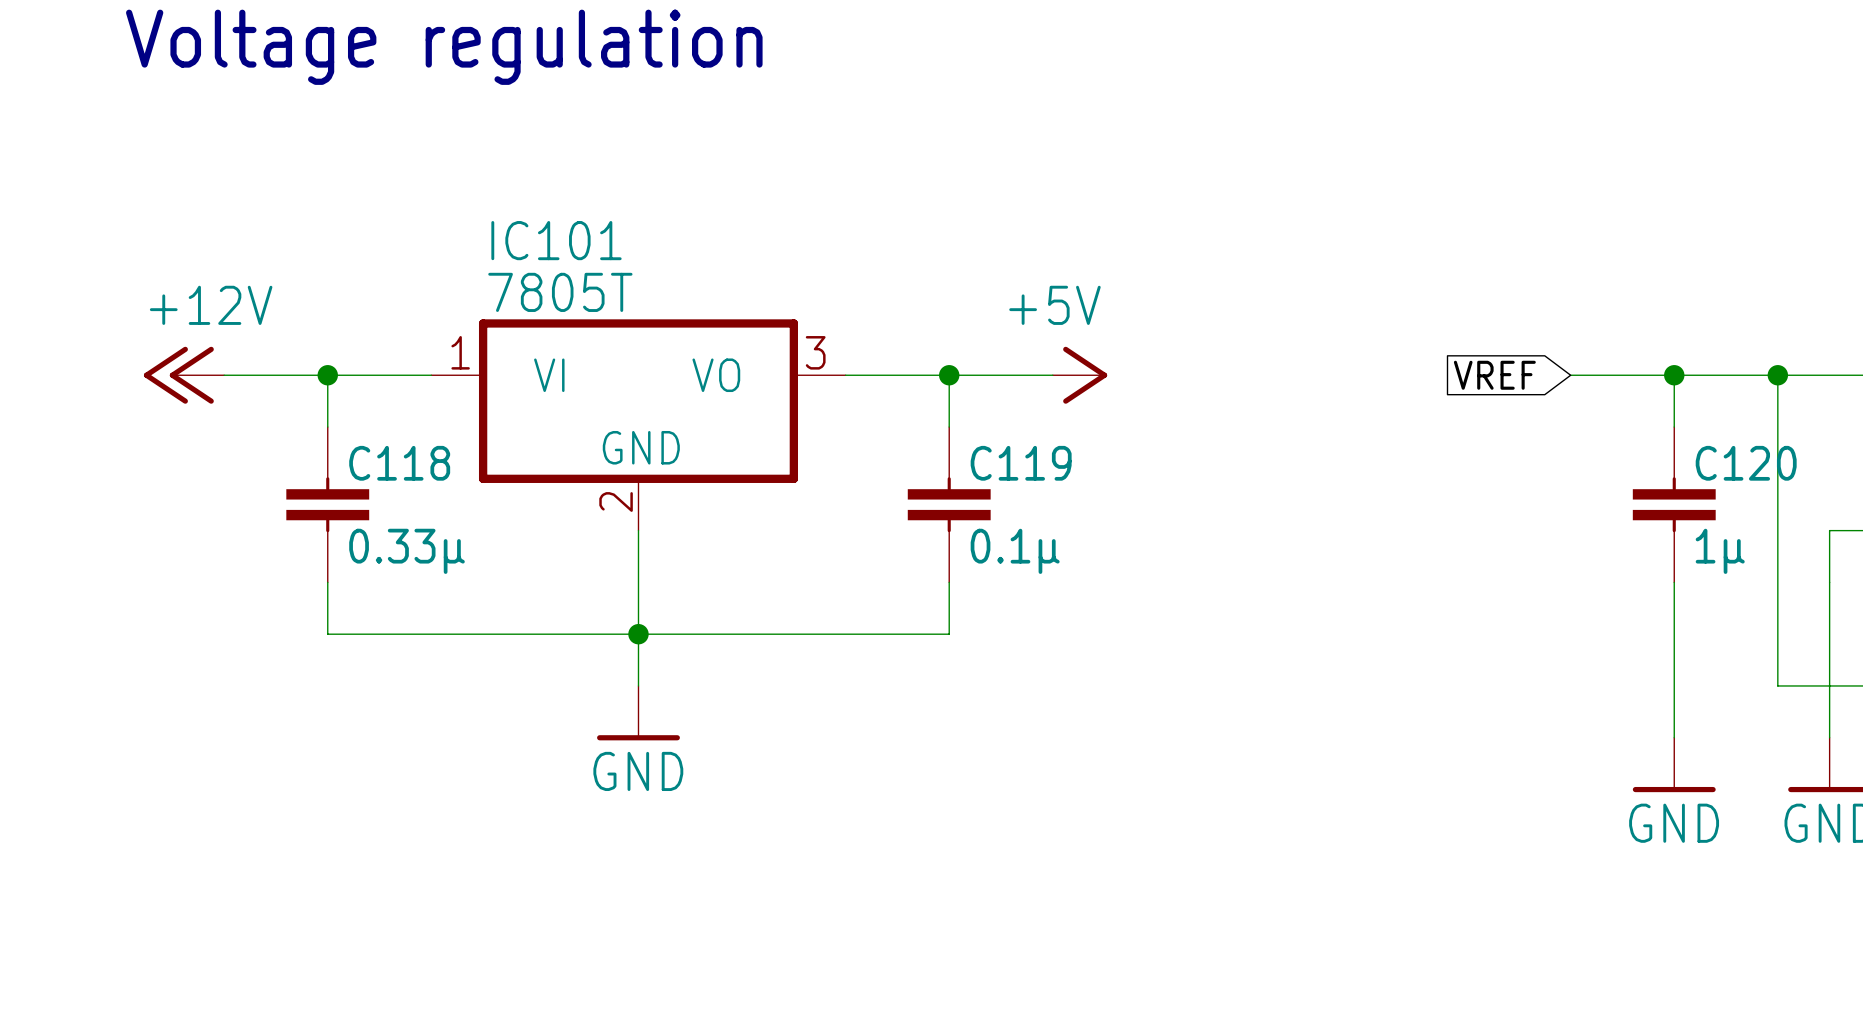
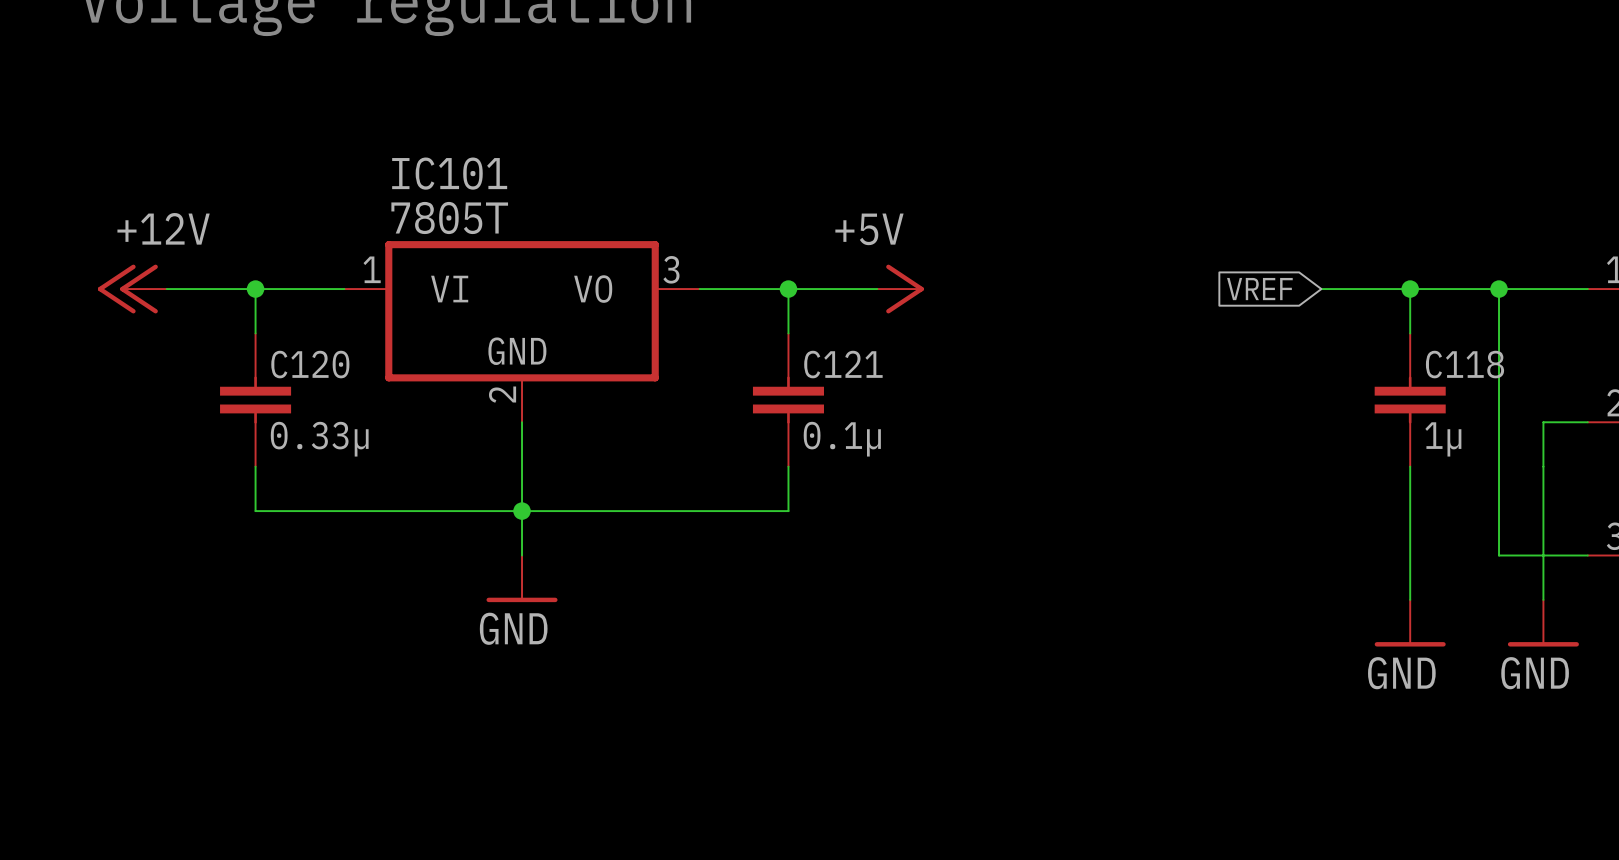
C118 name: C118 (399, 463) -> C120 (310, 364)
C119 name: C119 (1021, 463) -> C121 (843, 364)
C120 name: C120 (1746, 463) -> C118 (1465, 364)

